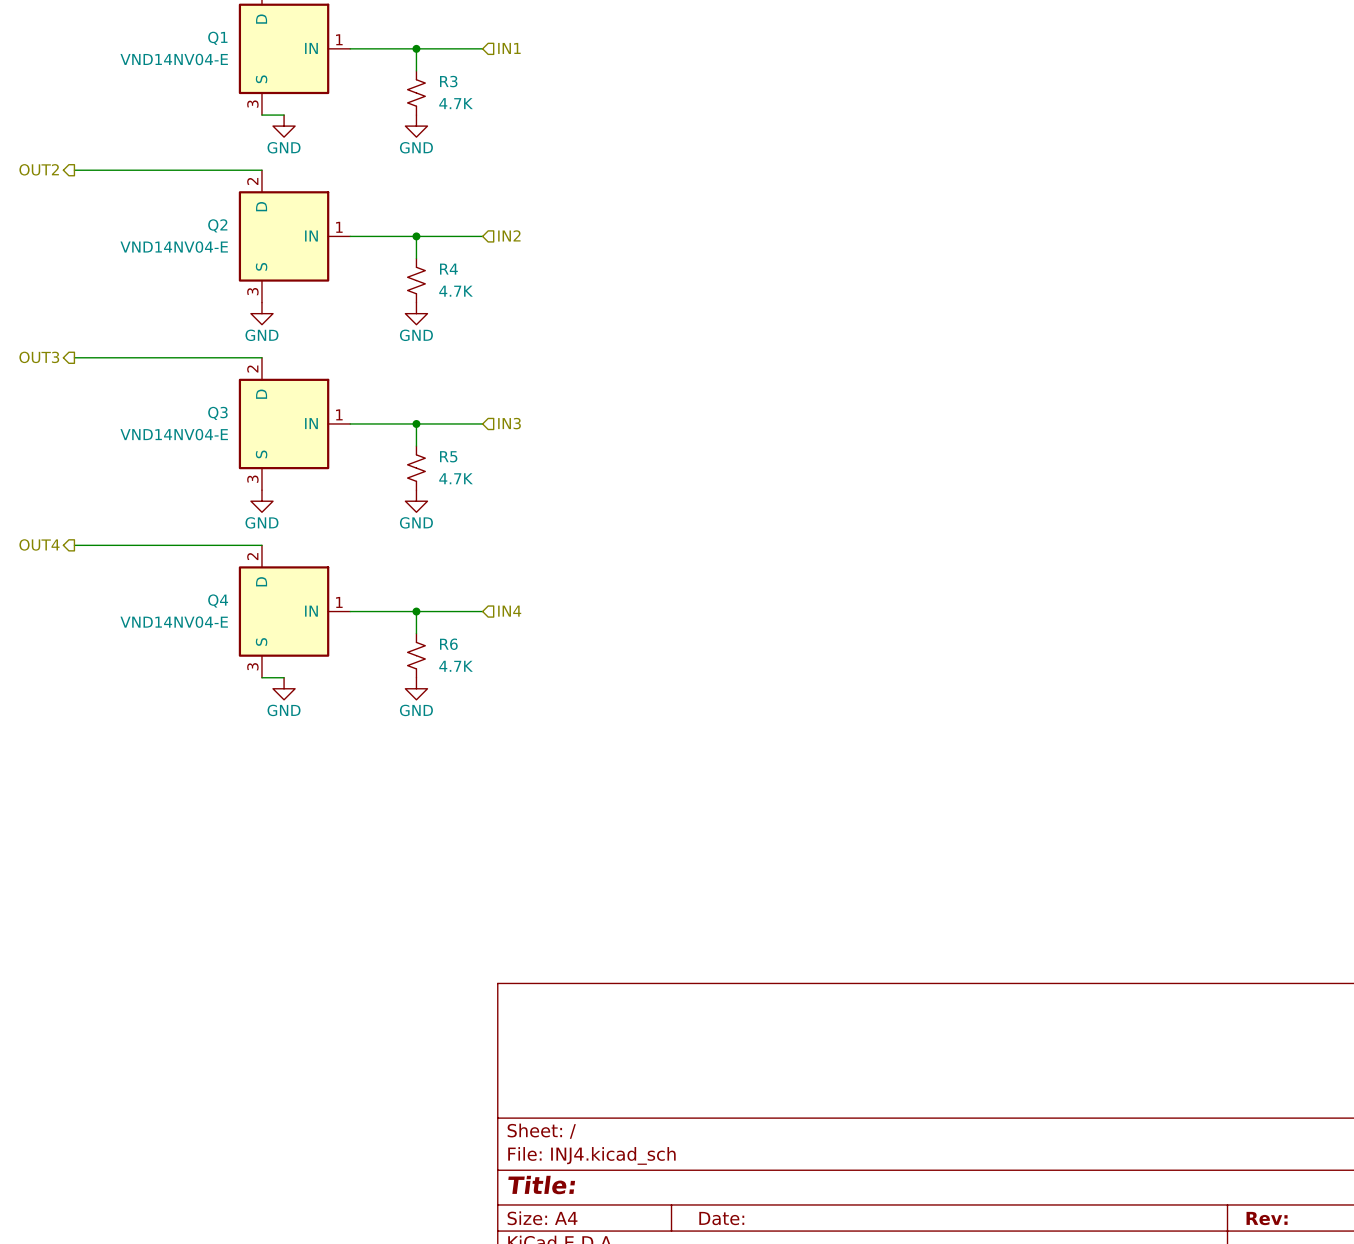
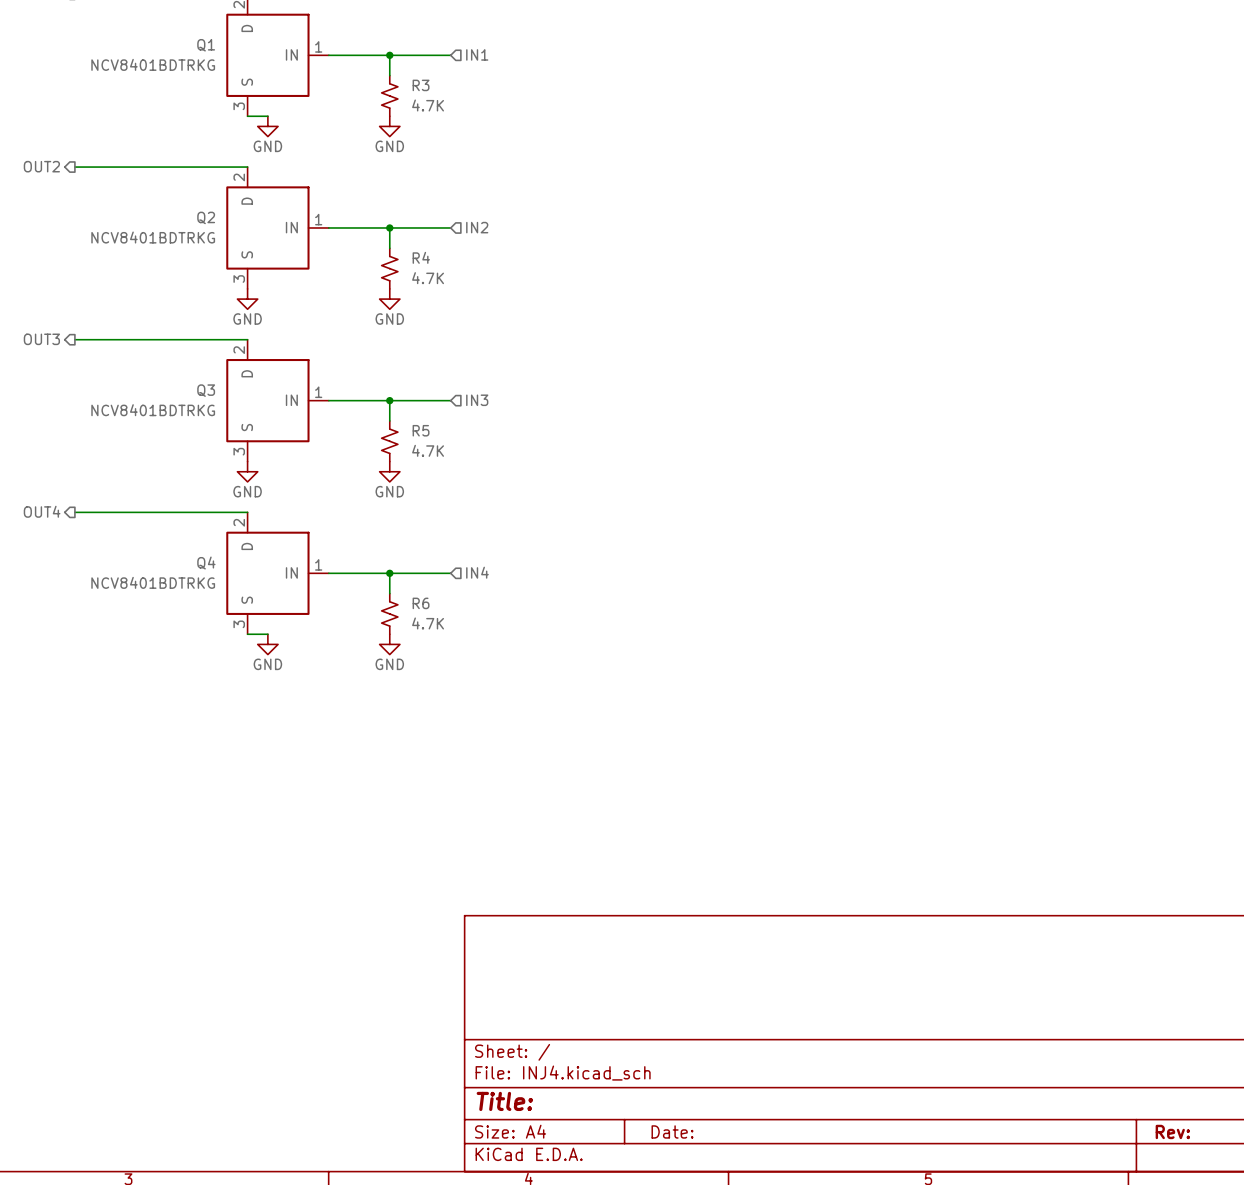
Q1 value: VND14NV04-E (174, 59) -> NCV8401BDTRKG (153, 64)
Q2 value: VND14NV04-E (174, 247) -> NCV8401BDTRKG (153, 237)
Q3 value: VND14NV04-E (174, 434) -> NCV8401BDTRKG (153, 410)
Q4 value: VND14NV04-E (174, 622) -> NCV8401BDTRKG (153, 582)

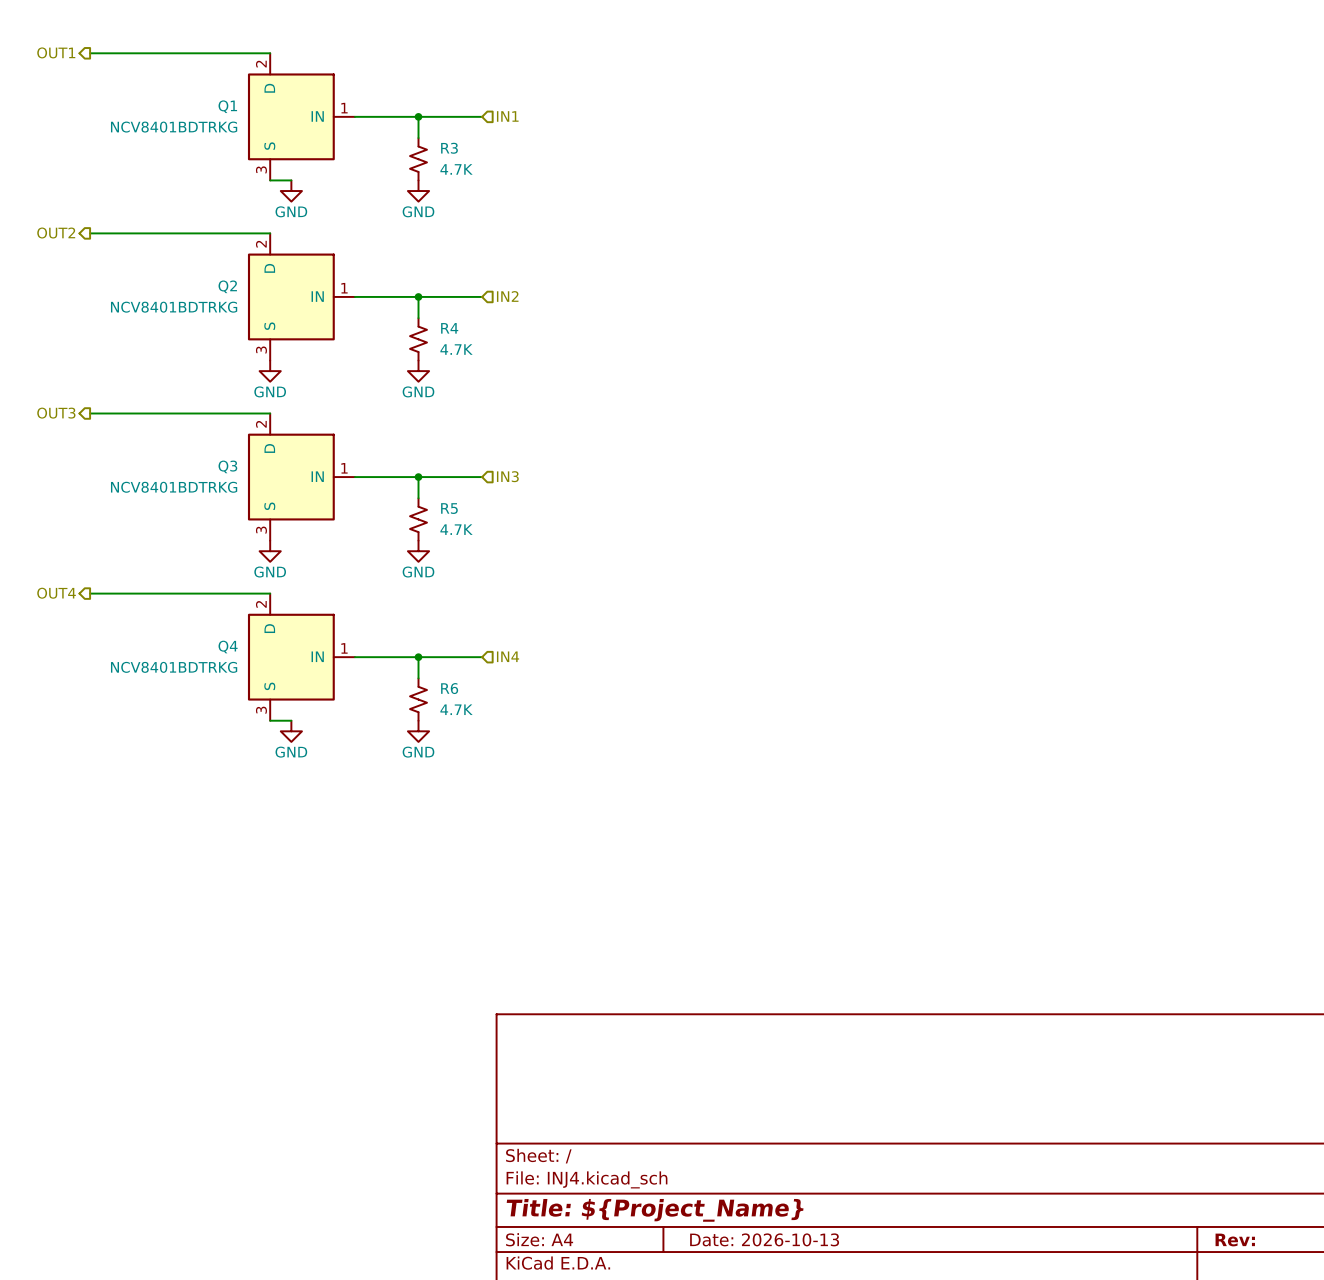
title block: Title: (504, 1101) -> Title: ${Project_Name} (655, 1210)
title block: Date: (672, 1131) -> Date: 2026-10-13 (764, 1239)

